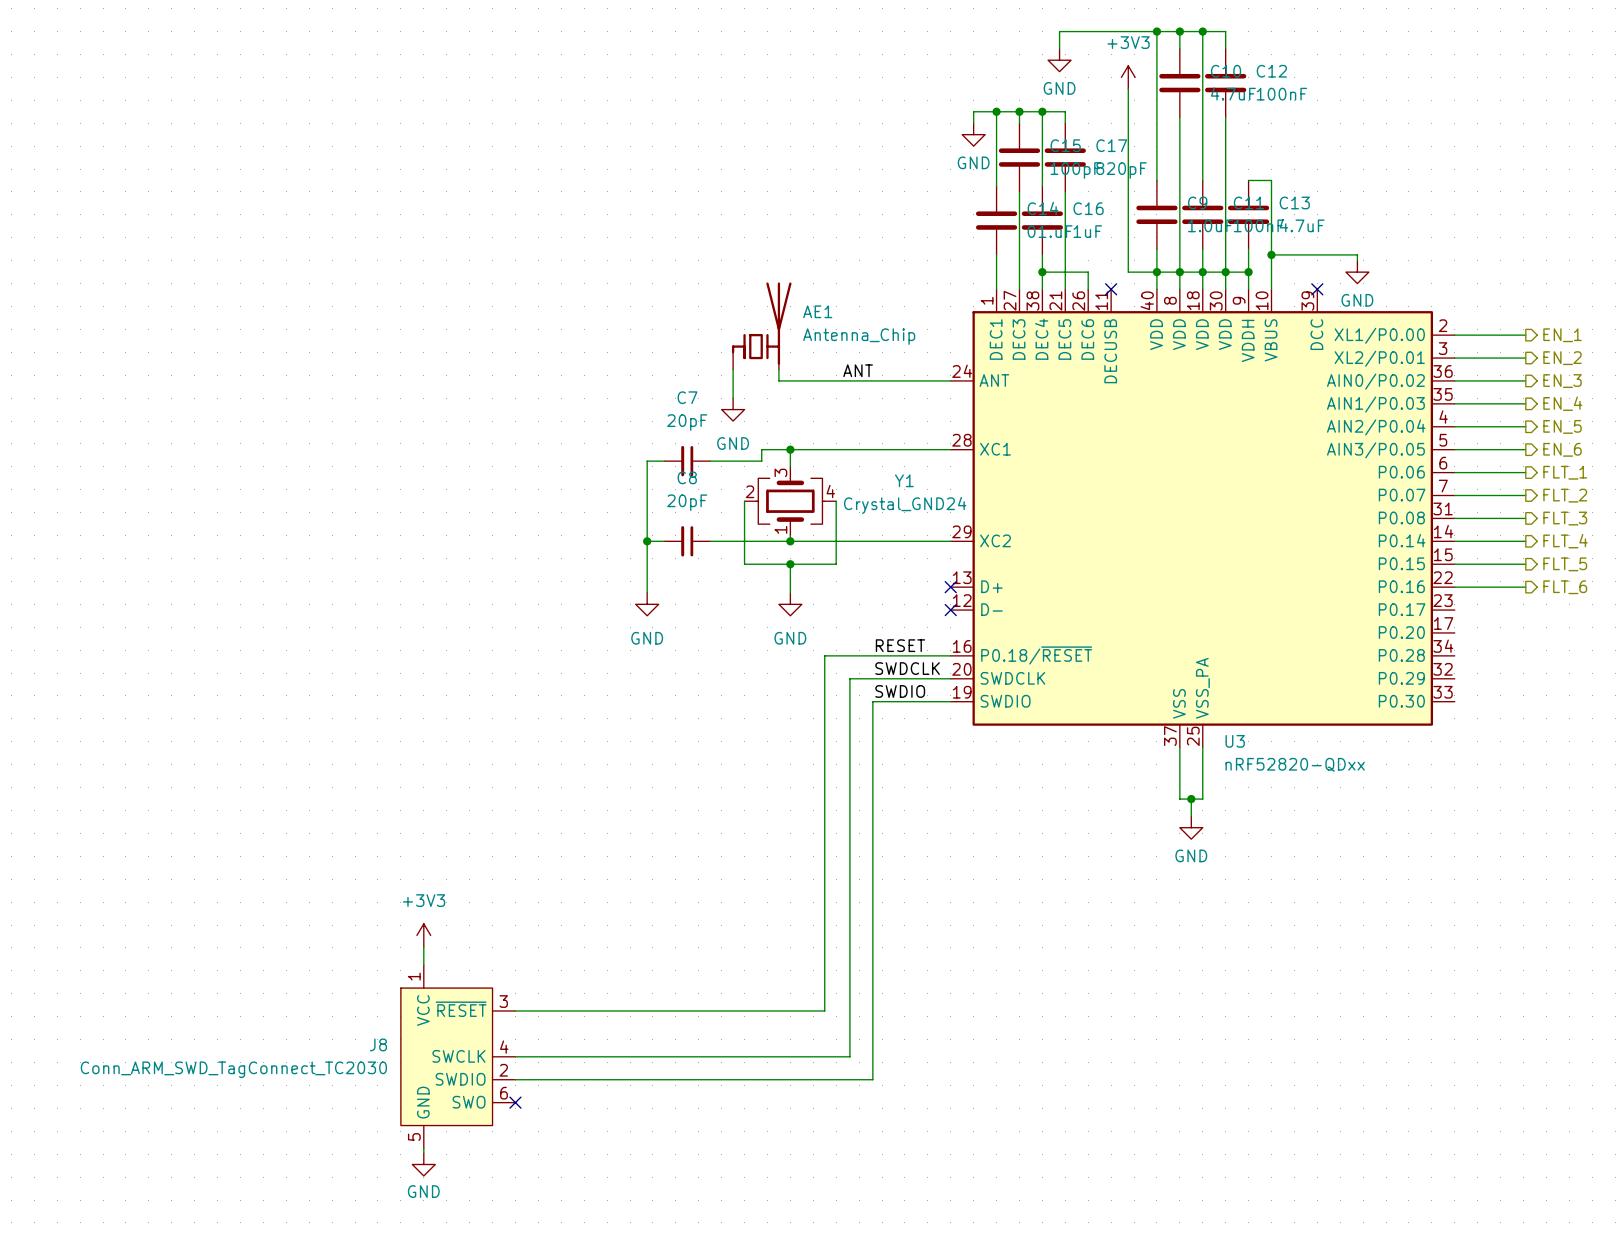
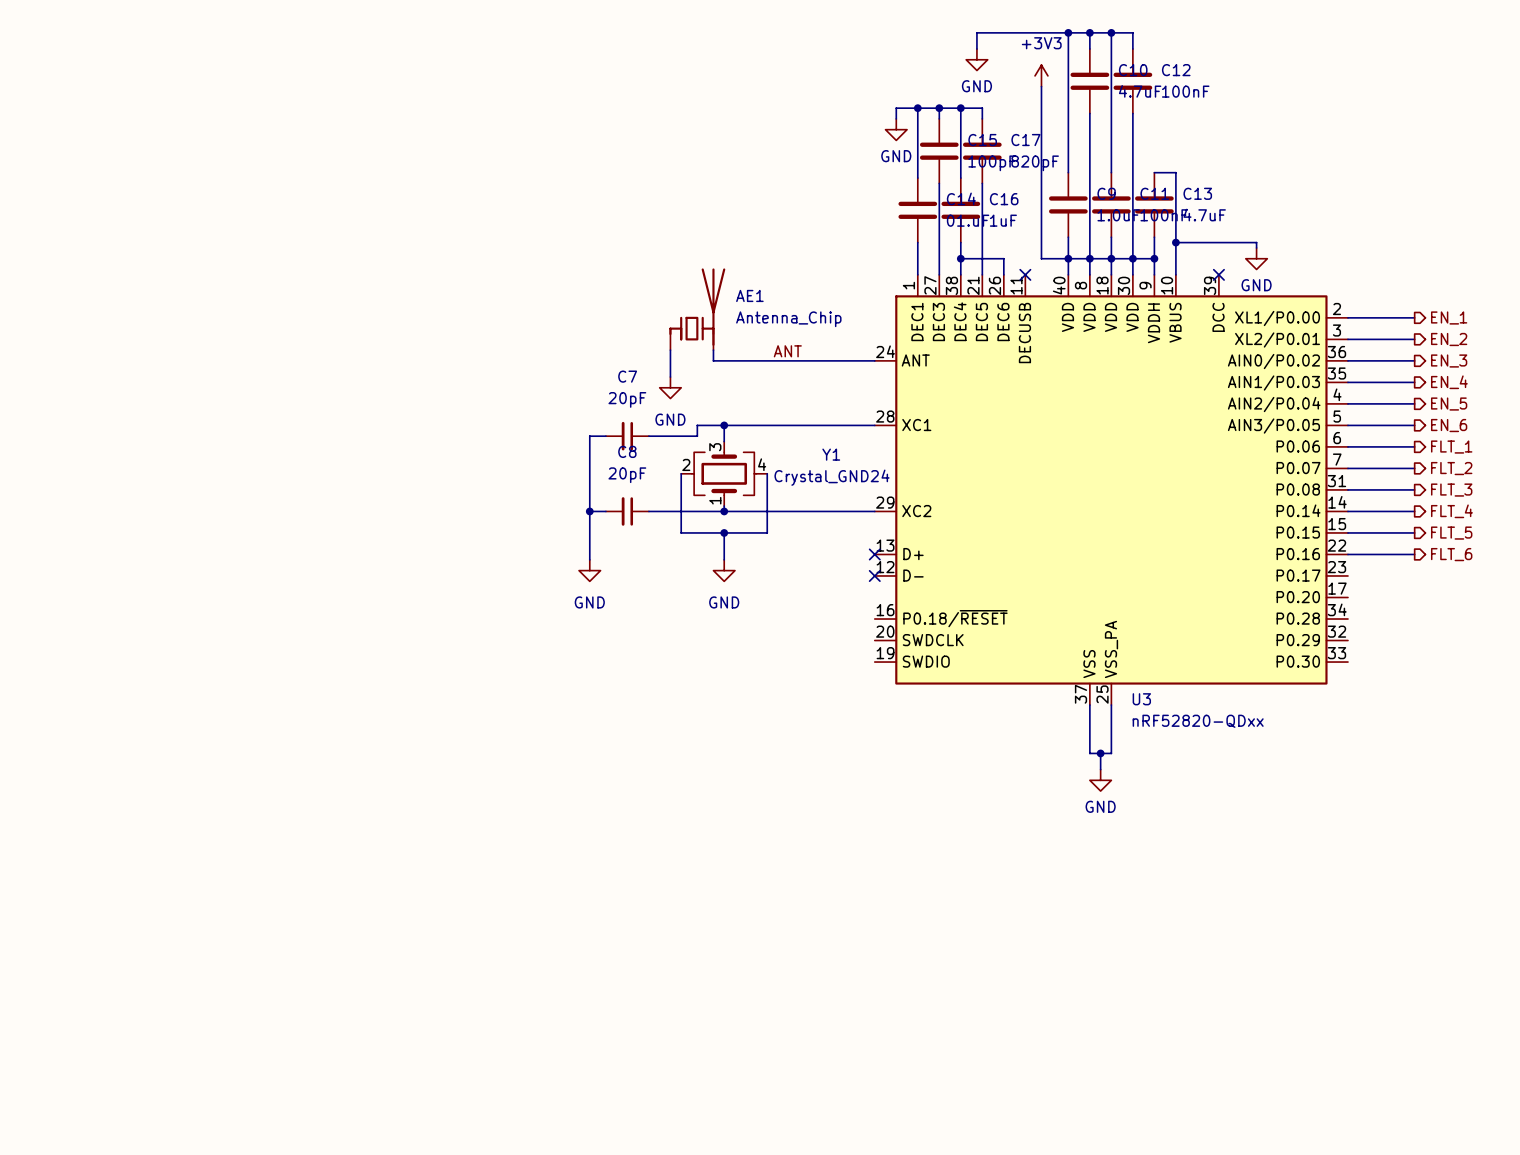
label: RESET (900, 645) -> none
wire: (950, 655) (824, 655) (824, 1010) (515, 1010) -> none
label: SWDCLK (907, 668) -> none
wire: (950, 678) (849, 678) (849, 1056) (515, 1056) -> none
label: SWDIO (900, 691) -> none
wire: (950, 701) (872, 701) (872, 1079) (515, 1079) -> none
power symbol: +3V3 (423, 935) -> none
wire: (423, 946) (423, 965) -> none
J8: Conn_ARM_SWD_TagConnect_TC2030 (458, 1056) -> none
no-connect mark: (515, 1102) -> none
wire: (423, 1148) (423, 1153) -> none
power symbol: GND (423, 1164) -> none

